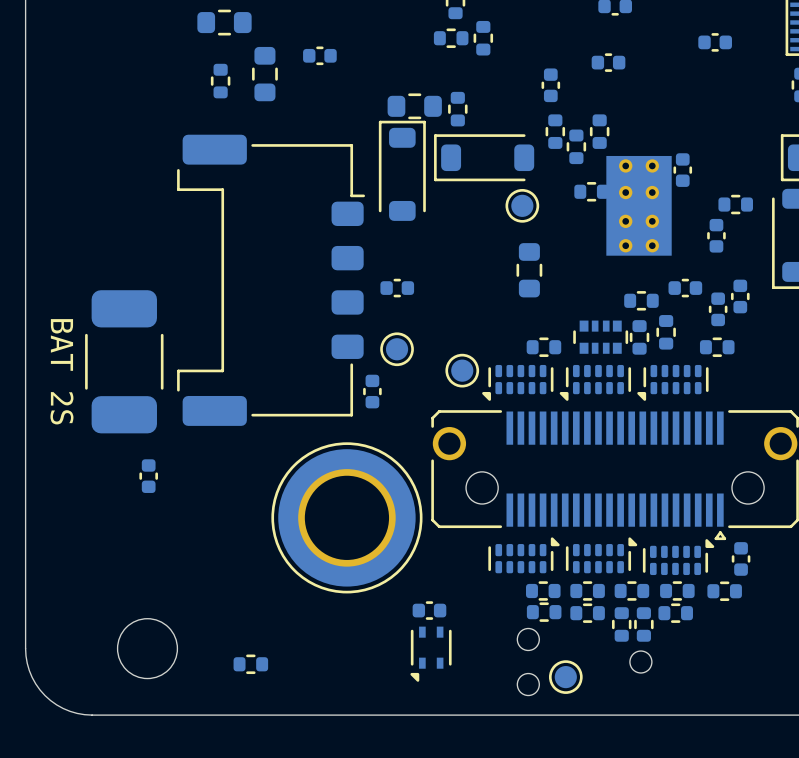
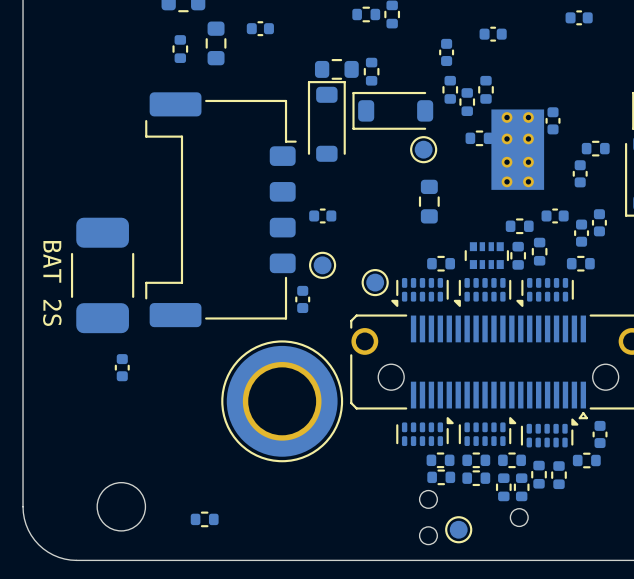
part: (677, 591) -> none
part: none -> (539, 474)
part: none -> (558, 475)
part: (429, 610) -> none
part: (675, 613) -> none
part: (431, 654) -> none

